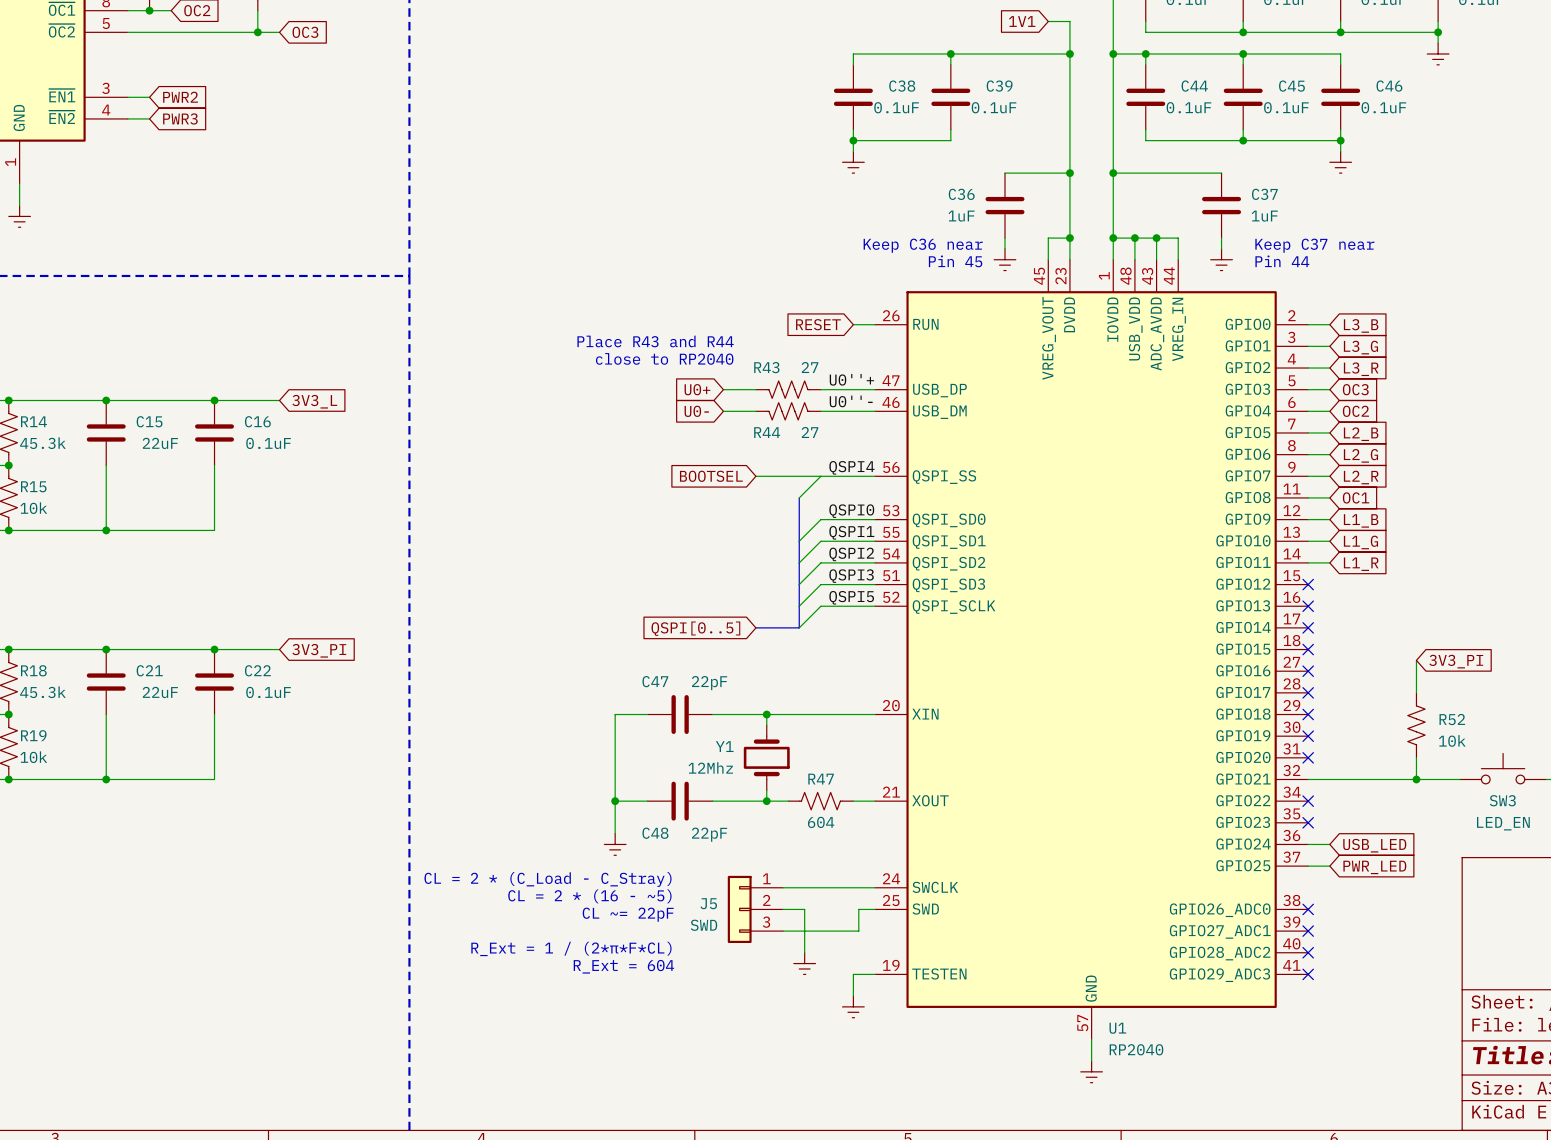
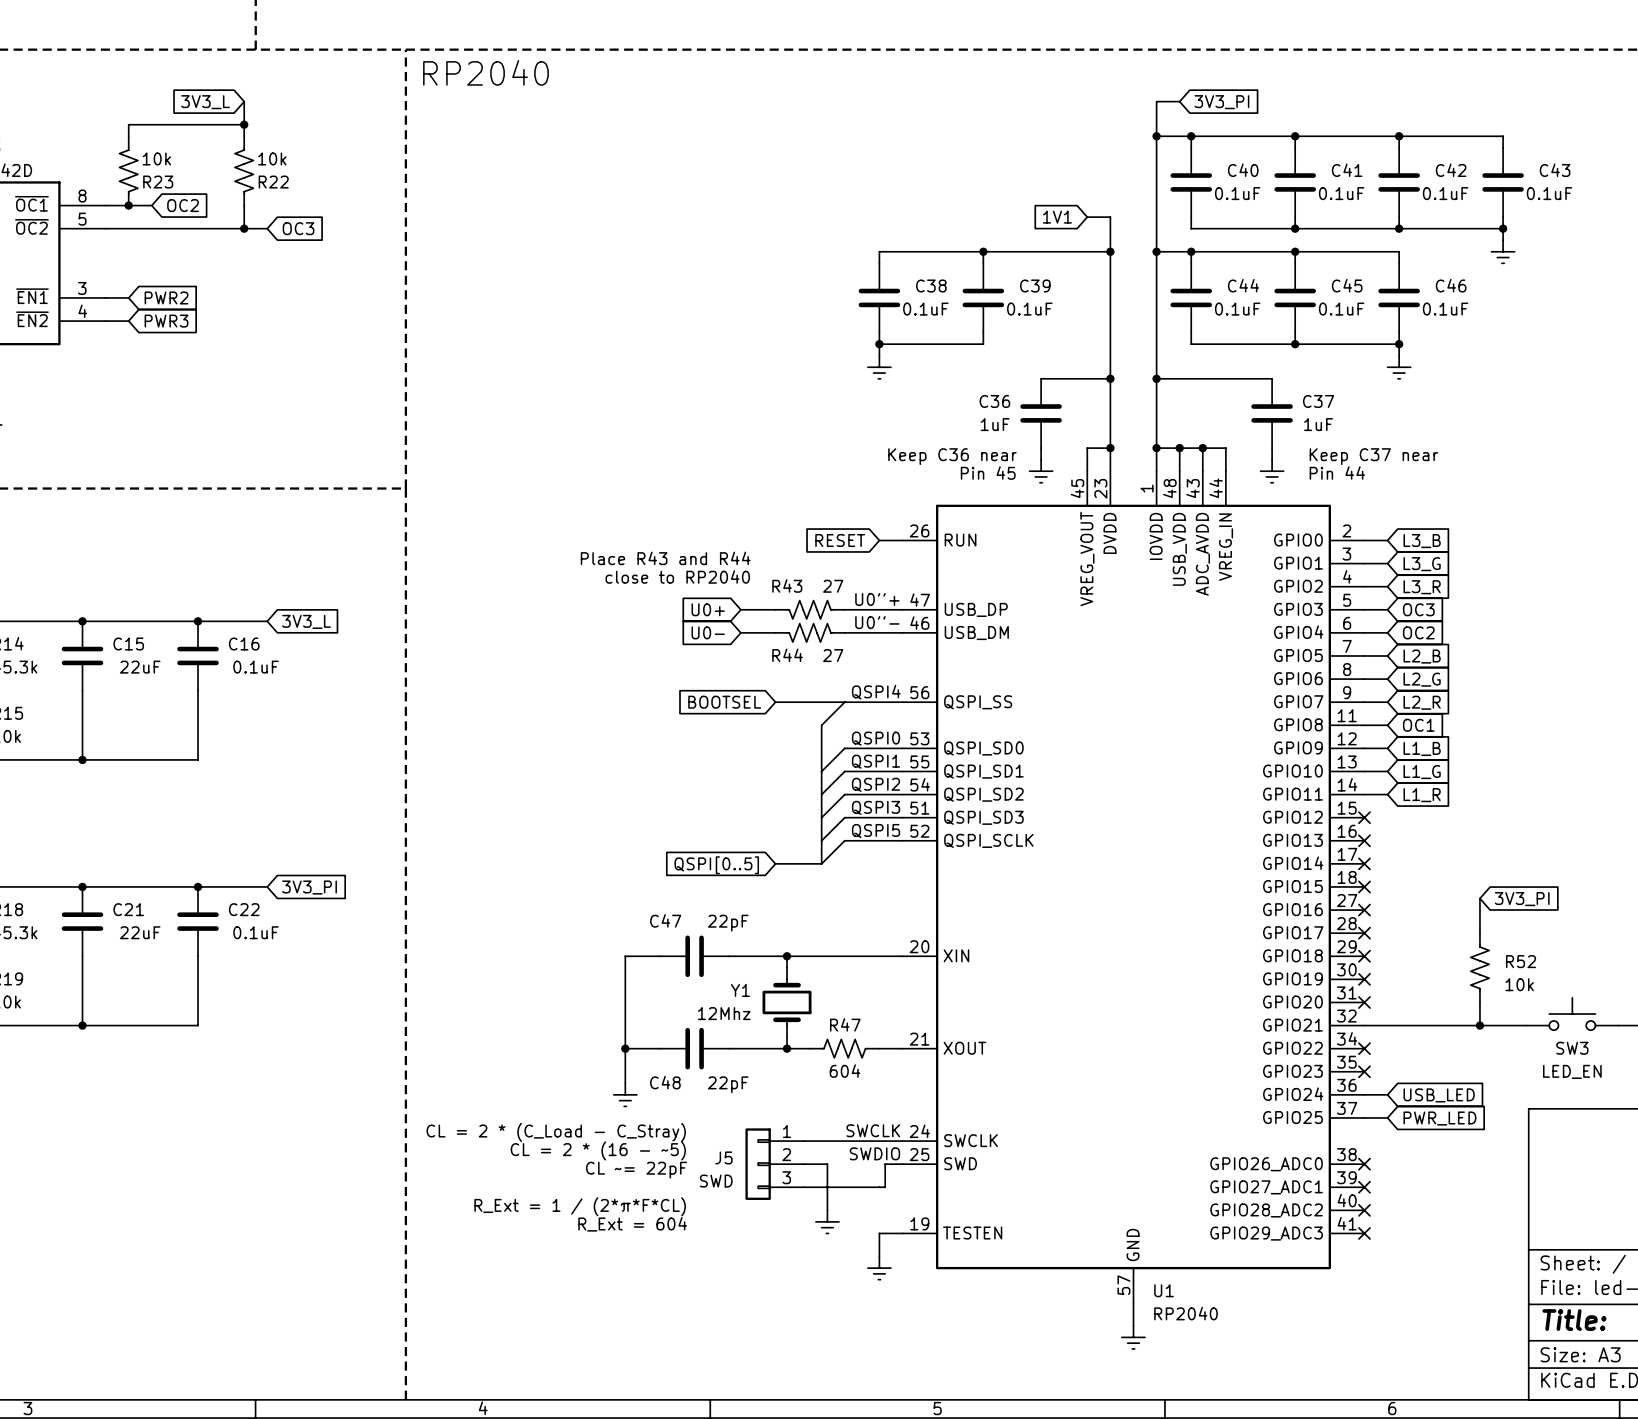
label: none -> SWCLK (873, 1130)
label: none -> SWDIO (874, 1153)

